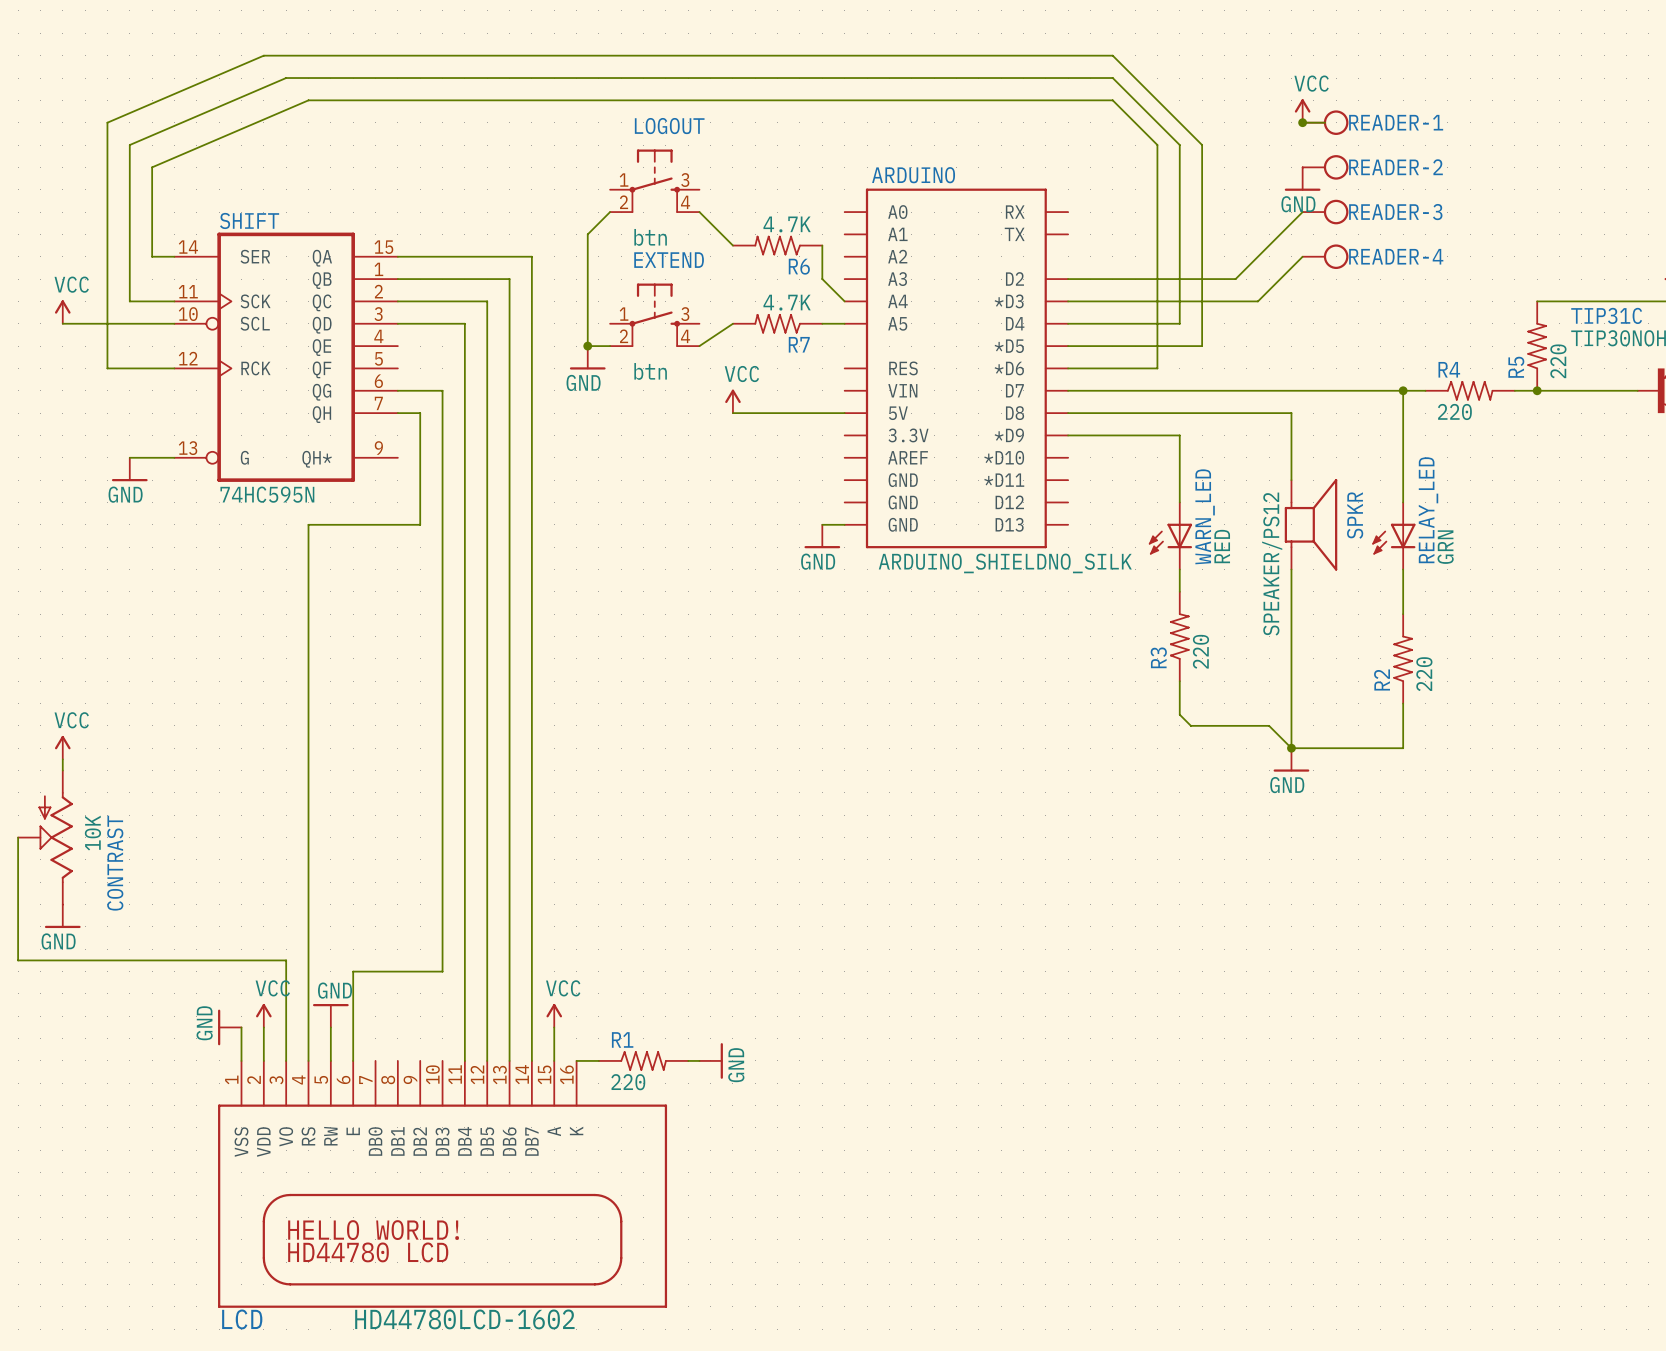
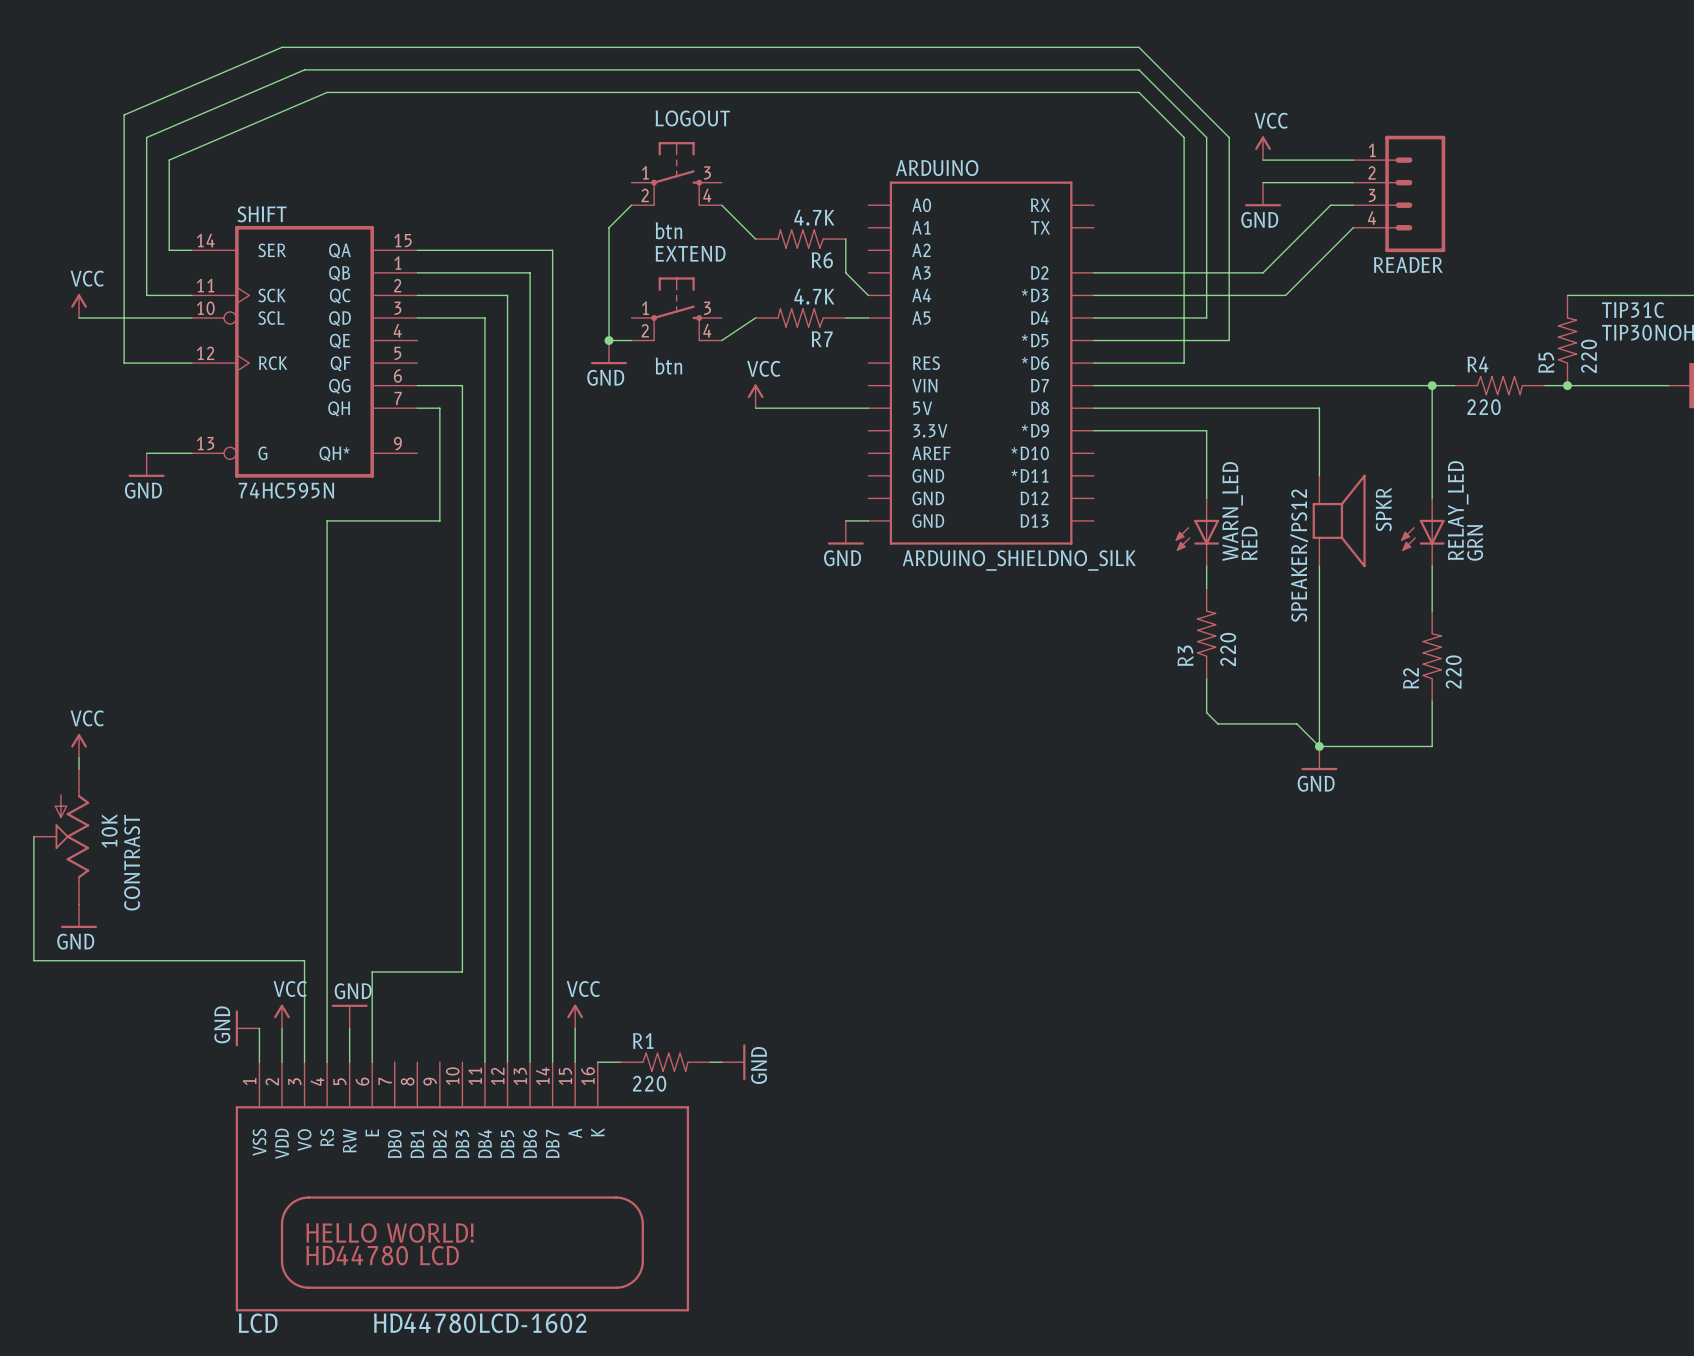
power symbol position: VCC (1302, 110) -> VCC (1263, 148)
junction: (1302, 122) -> none
READER-1: (1325, 122) -> none
wire: none -> (1263, 160) (1353, 160)
READER-2: (1325, 167) -> none
power symbol position: GND (1302, 179) -> GND (1263, 194)
wire: none -> (1263, 182) (1353, 182)
READER: none -> (1399, 193)
READER-3: (1325, 212) -> none
wire: none -> (1353, 227) (1330, 250)
READER-4: (1325, 256) -> none

